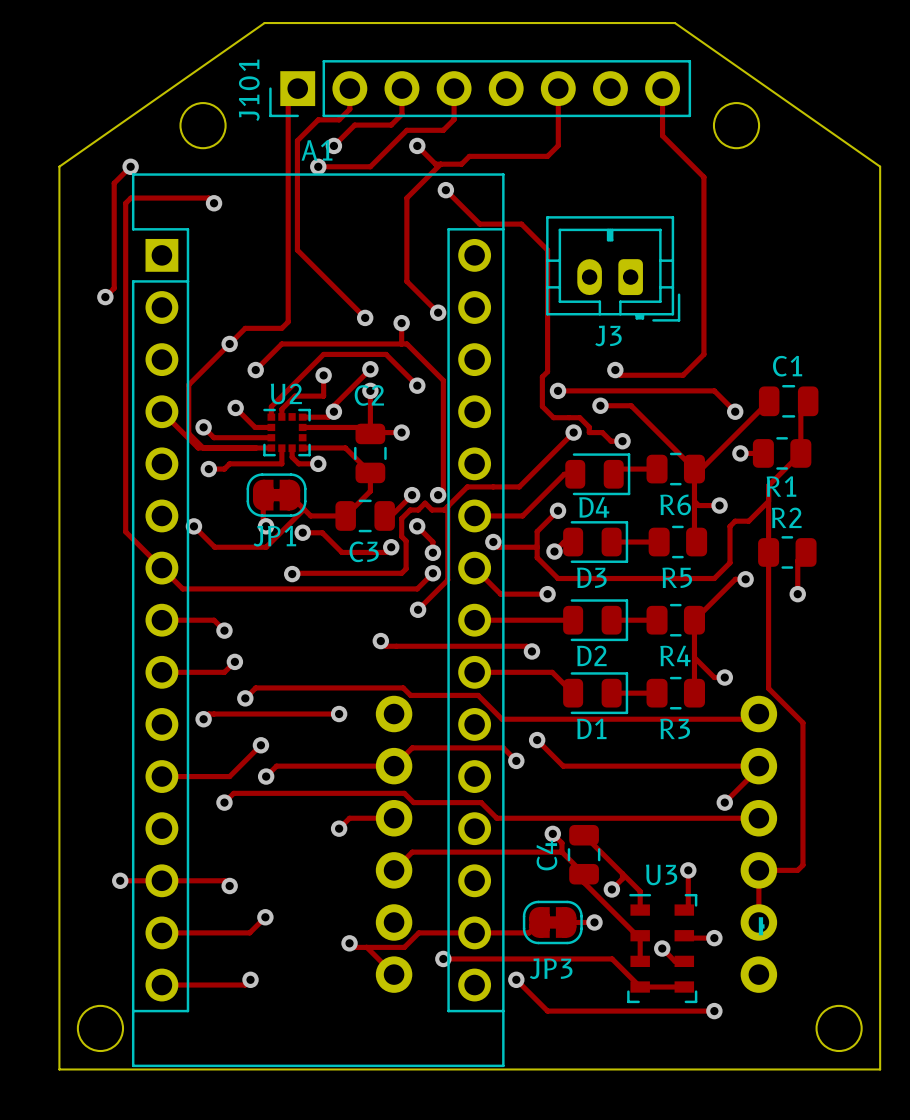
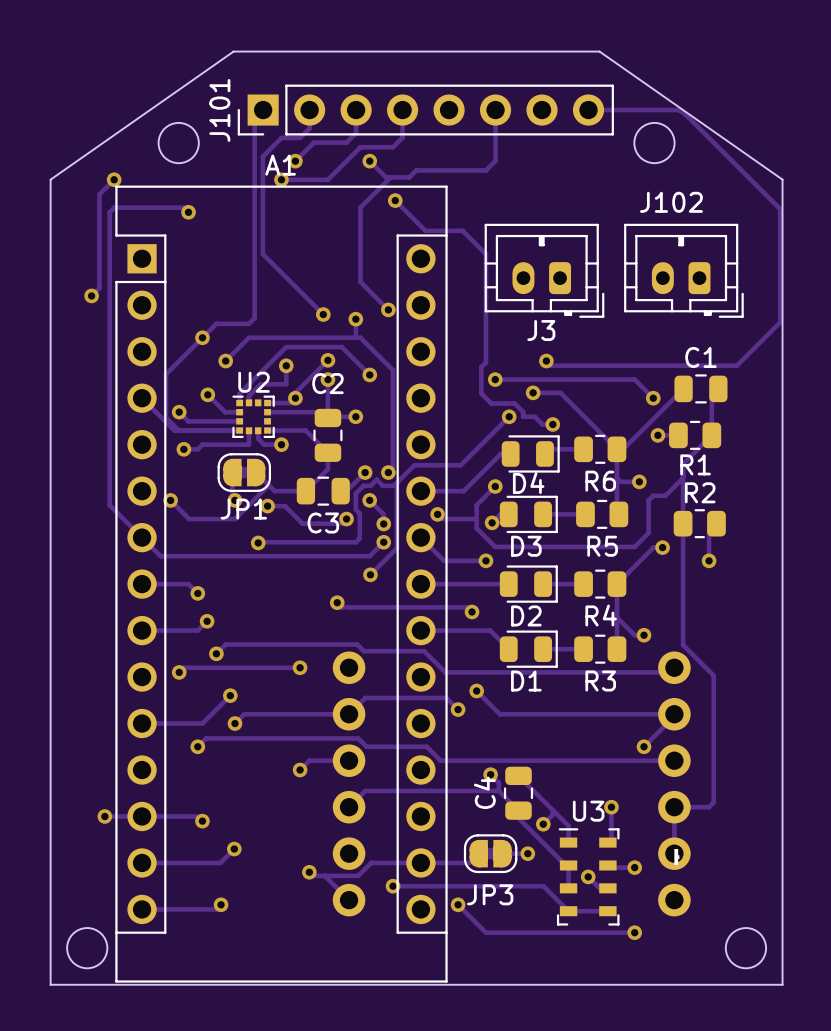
track: (662, 88) (662, 135) (703, 177) (703, 354) (683, 375) -> (588, 110) (679, 110) (780, 209) (780, 322) (736, 365) (606, 365)
J102: none -> (683, 270)

